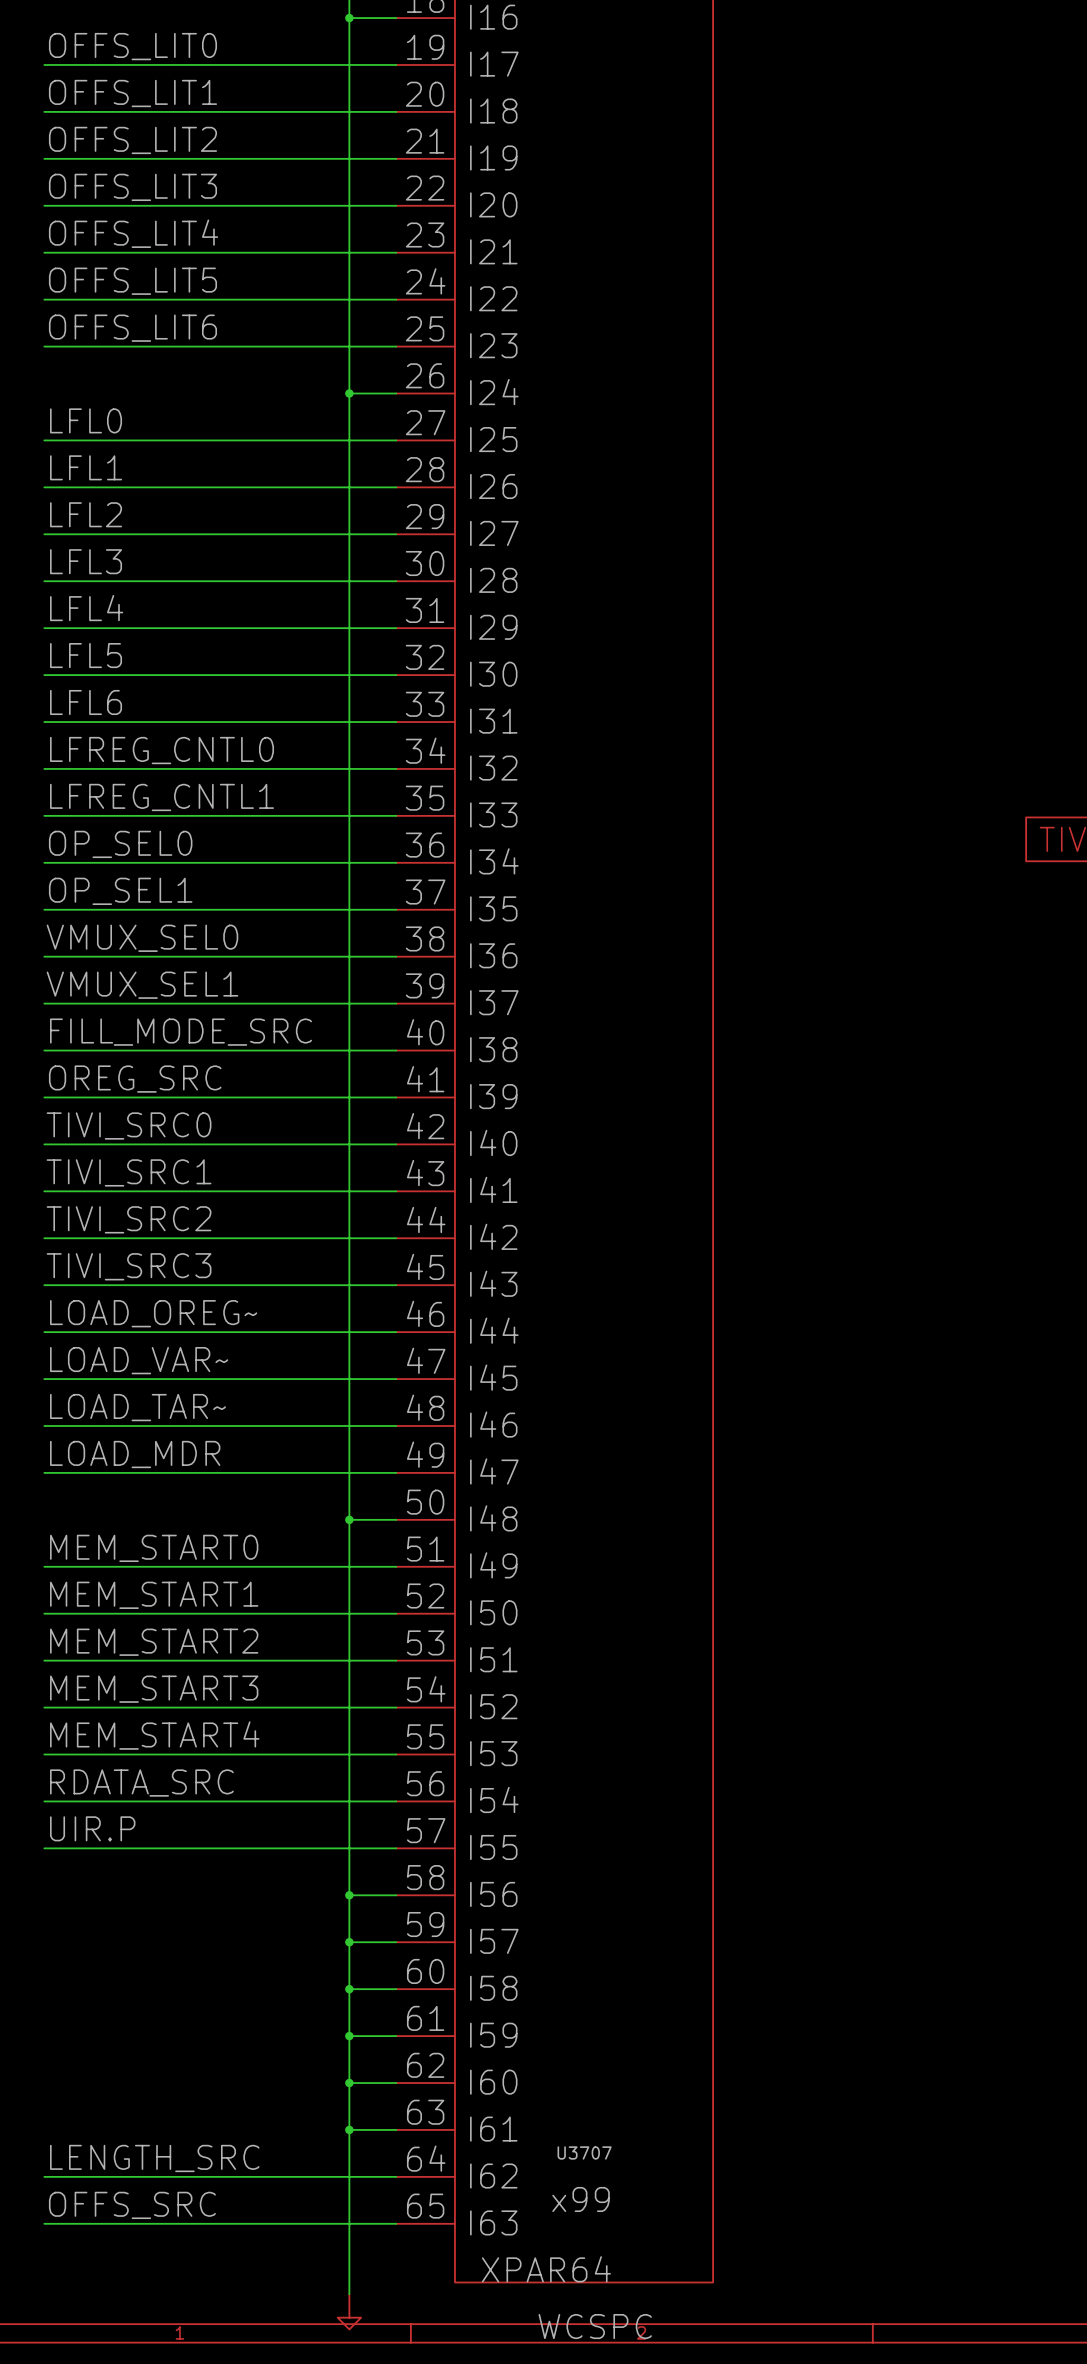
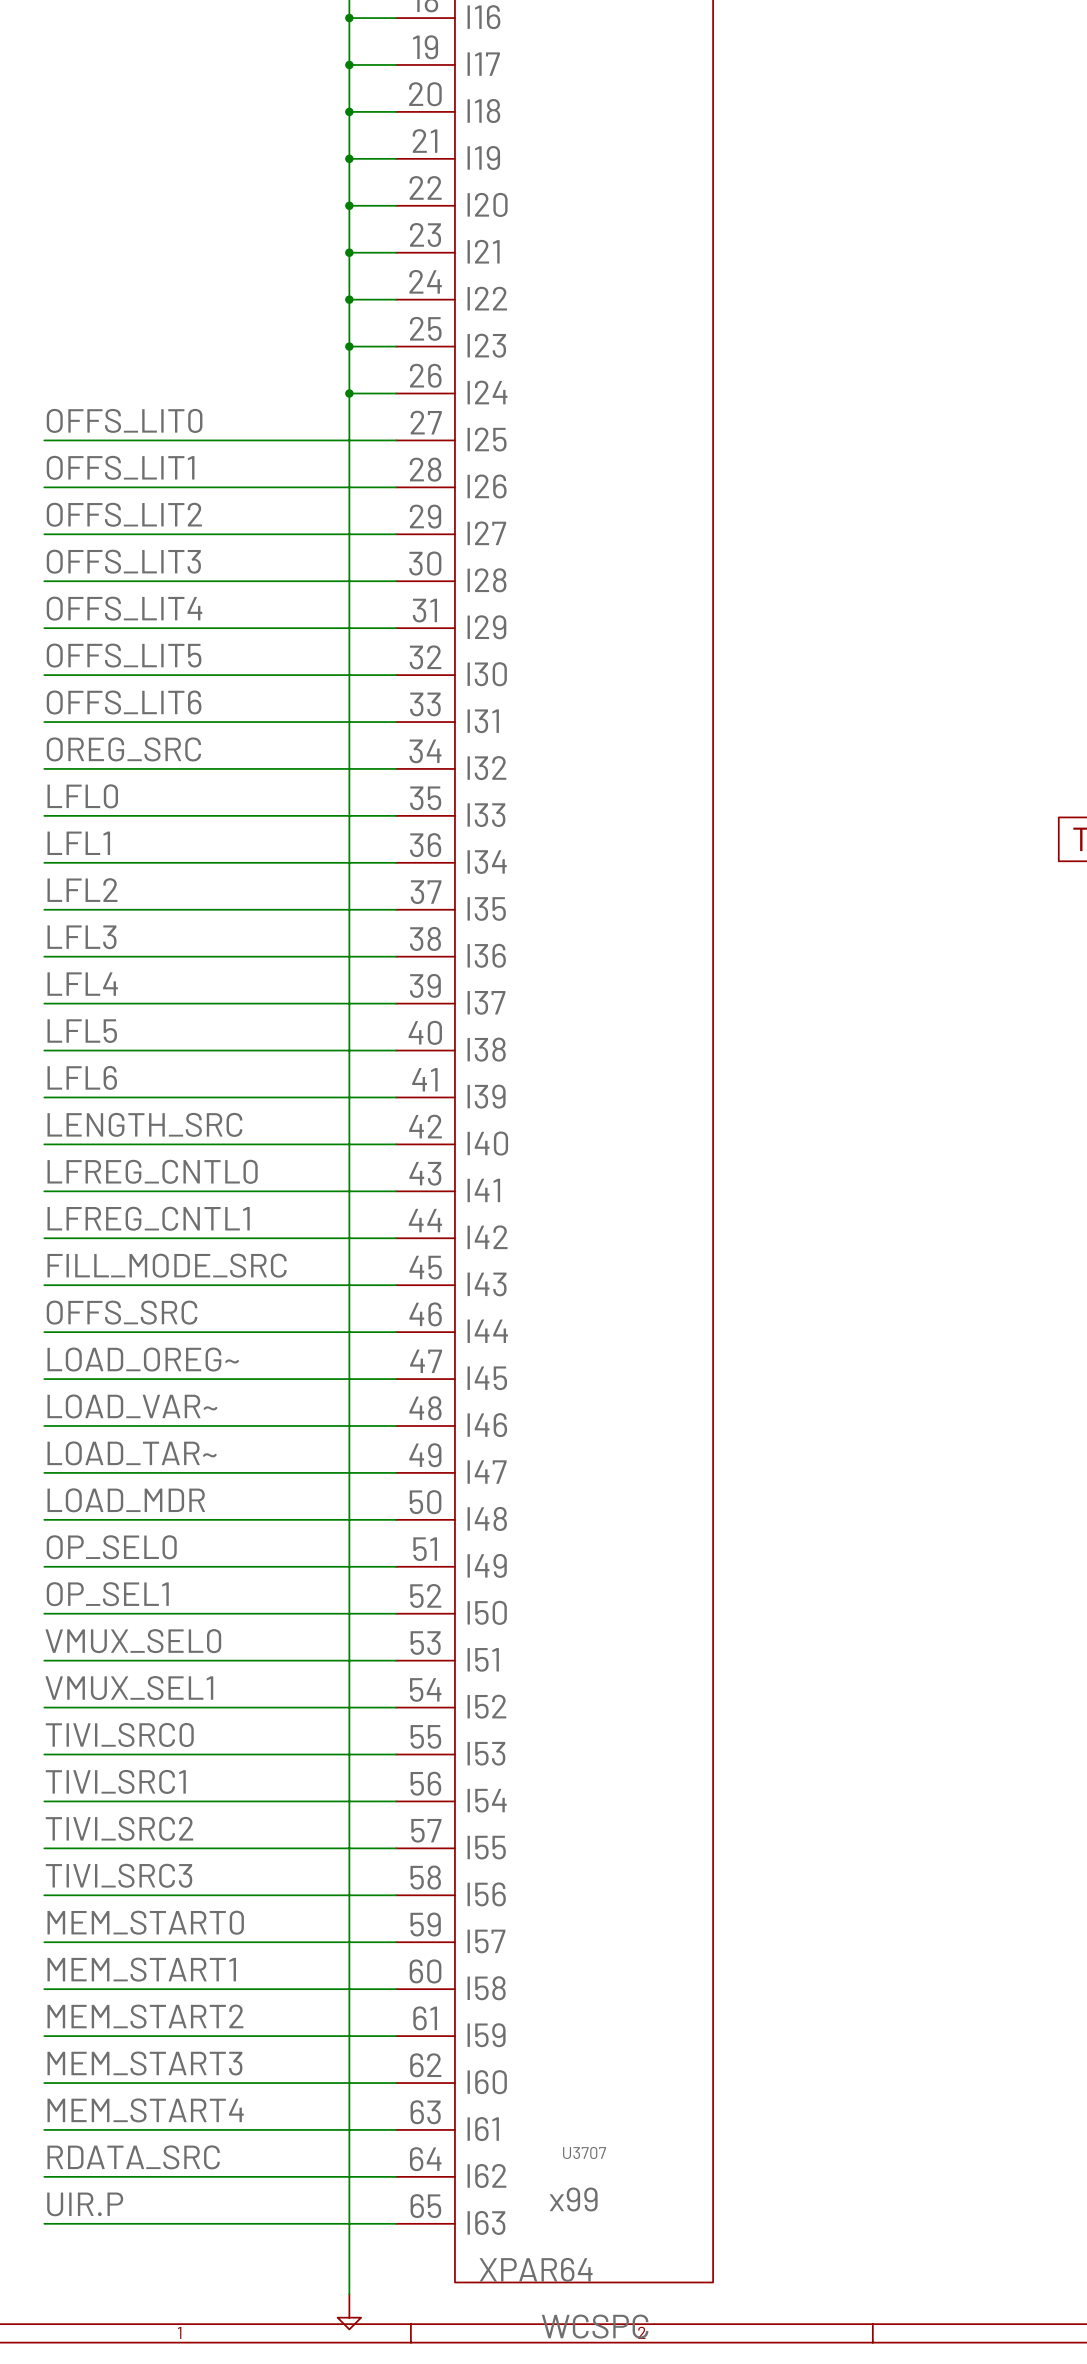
label: OFFS_LIT0 (132, 46) -> none
wire: (44, 64) (349, 64) -> none
junction: none -> (349, 64)
label: OFFS_LIT1 (132, 93) -> none
wire: (44, 111) (349, 111) -> none
junction: none -> (349, 111)
label: OFFS_LIT2 (132, 140) -> none
wire: (44, 158) (349, 158) -> none
junction: none -> (349, 158)
label: OFFS_LIT3 (132, 187) -> none
wire: (44, 205) (349, 205) -> none
junction: none -> (349, 205)
label: OFFS_LIT4 (133, 233) -> none
wire: (44, 252) (349, 252) -> none
junction: none -> (349, 252)
label: OFFS_LIT5 (132, 281) -> none
wire: (44, 299) (349, 299) -> none
junction: none -> (349, 299)
label: OFFS_LIT6 (132, 328) -> none
wire: (44, 346) (349, 346) -> none
junction: none -> (349, 346)
label: LFL0 (86, 420) -> OFFS_LIT0 (124, 420)
label: LFL1 (86, 467) -> OFFS_LIT1 (120, 467)
label: LFL2 (86, 514) -> OFFS_LIT2 (124, 514)
label: LFL3 (86, 561) -> OFFS_LIT3 (123, 561)
label: LFL4 (86, 608) -> OFFS_LIT4 (124, 608)
label: LFL5 (86, 655) -> OFFS_LIT5 (124, 655)
label: LFL6 (86, 702) -> OFFS_LIT6 (124, 702)
label: LFREG_CNTL0 (162, 750) -> OREG_SRC (123, 749)
label: LFREG_CNTL1 (162, 797) -> LFL0 (82, 796)
label: OP_SEL0 (120, 844) -> LFL1 (78, 843)
label: OP_SEL1 (120, 891) -> LFL2 (82, 890)
label: VMUX_SEL0 (142, 938) -> LFL3 (82, 937)
label: VMUX_SEL1 (142, 985) -> LFL4 (82, 984)
label: FILL_MODE_SRC (181, 1032) -> LFL5 (82, 1031)
label: OREG_SRC (135, 1079) -> LFL6 (82, 1077)
label: TIVI_SRC0 (129, 1125) -> LENGTH_SRC (144, 1124)
label: TIVI_SRC1 (129, 1172) -> LFREG_CNTL0 (152, 1171)
label: TIVI_SRC2 (129, 1219) -> LFREG_CNTL1 (148, 1218)
label: TIVI_SRC3 (129, 1266) -> FILL_MODE_SRC (167, 1265)
label: LOAD_OREG~ (153, 1313) -> OFFS_SRC (122, 1312)
label: LOAD_VAR~ (139, 1360) -> LOAD_OREG~ (143, 1359)
label: LOAD_TAR~ (137, 1407) -> LOAD_VAR~ (132, 1406)
label: LOAD_MDR (135, 1454) -> LOAD_TAR~ (132, 1453)
label: none -> LOAD_MDR (126, 1500)
wire: none -> (44, 1519) (349, 1519)
junction: (349, 1519) -> none
label: MEM_START0 (154, 1548) -> OP_SEL0 (111, 1547)
label: MEM_START1 (154, 1595) -> OP_SEL1 (107, 1594)
label: MEM_START2 (154, 1642) -> VMUX_SEL0 (133, 1641)
label: MEM_START3 (154, 1689) -> VMUX_SEL1 (129, 1688)
label: MEM_START4 (154, 1735) -> TIVI_SRC0 (119, 1734)
label: RDATA_SRC (141, 1783) -> TIVI_SRC1 (115, 1781)
label: UIR.P (92, 1828) -> TIVI_SRC2 (119, 1828)
label: none -> TIVI_SRC3 (119, 1875)
wire: none -> (44, 1895) (349, 1895)
junction: (349, 1895) -> none
label: none -> MEM_START0 (145, 1922)
wire: none -> (44, 1942) (349, 1942)
junction: (349, 1942) -> none
label: none -> MEM_START1 (141, 1969)
wire: none -> (44, 1989) (349, 1989)
junction: (349, 1989) -> none
label: none -> MEM_START2 (145, 2016)
wire: none -> (44, 2036) (349, 2036)
junction: (349, 2036) -> none
label: none -> MEM_START3 (144, 2063)
wire: none -> (44, 2083) (349, 2083)
junction: (349, 2083) -> none
label: none -> MEM_START4 (145, 2110)
wire: none -> (44, 2129) (349, 2129)
junction: (349, 2129) -> none
label: LENGTH_SRC (154, 2158) -> RDATA_SRC (133, 2157)
label: OFFS_SRC (132, 2205) -> UIR.P (85, 2204)

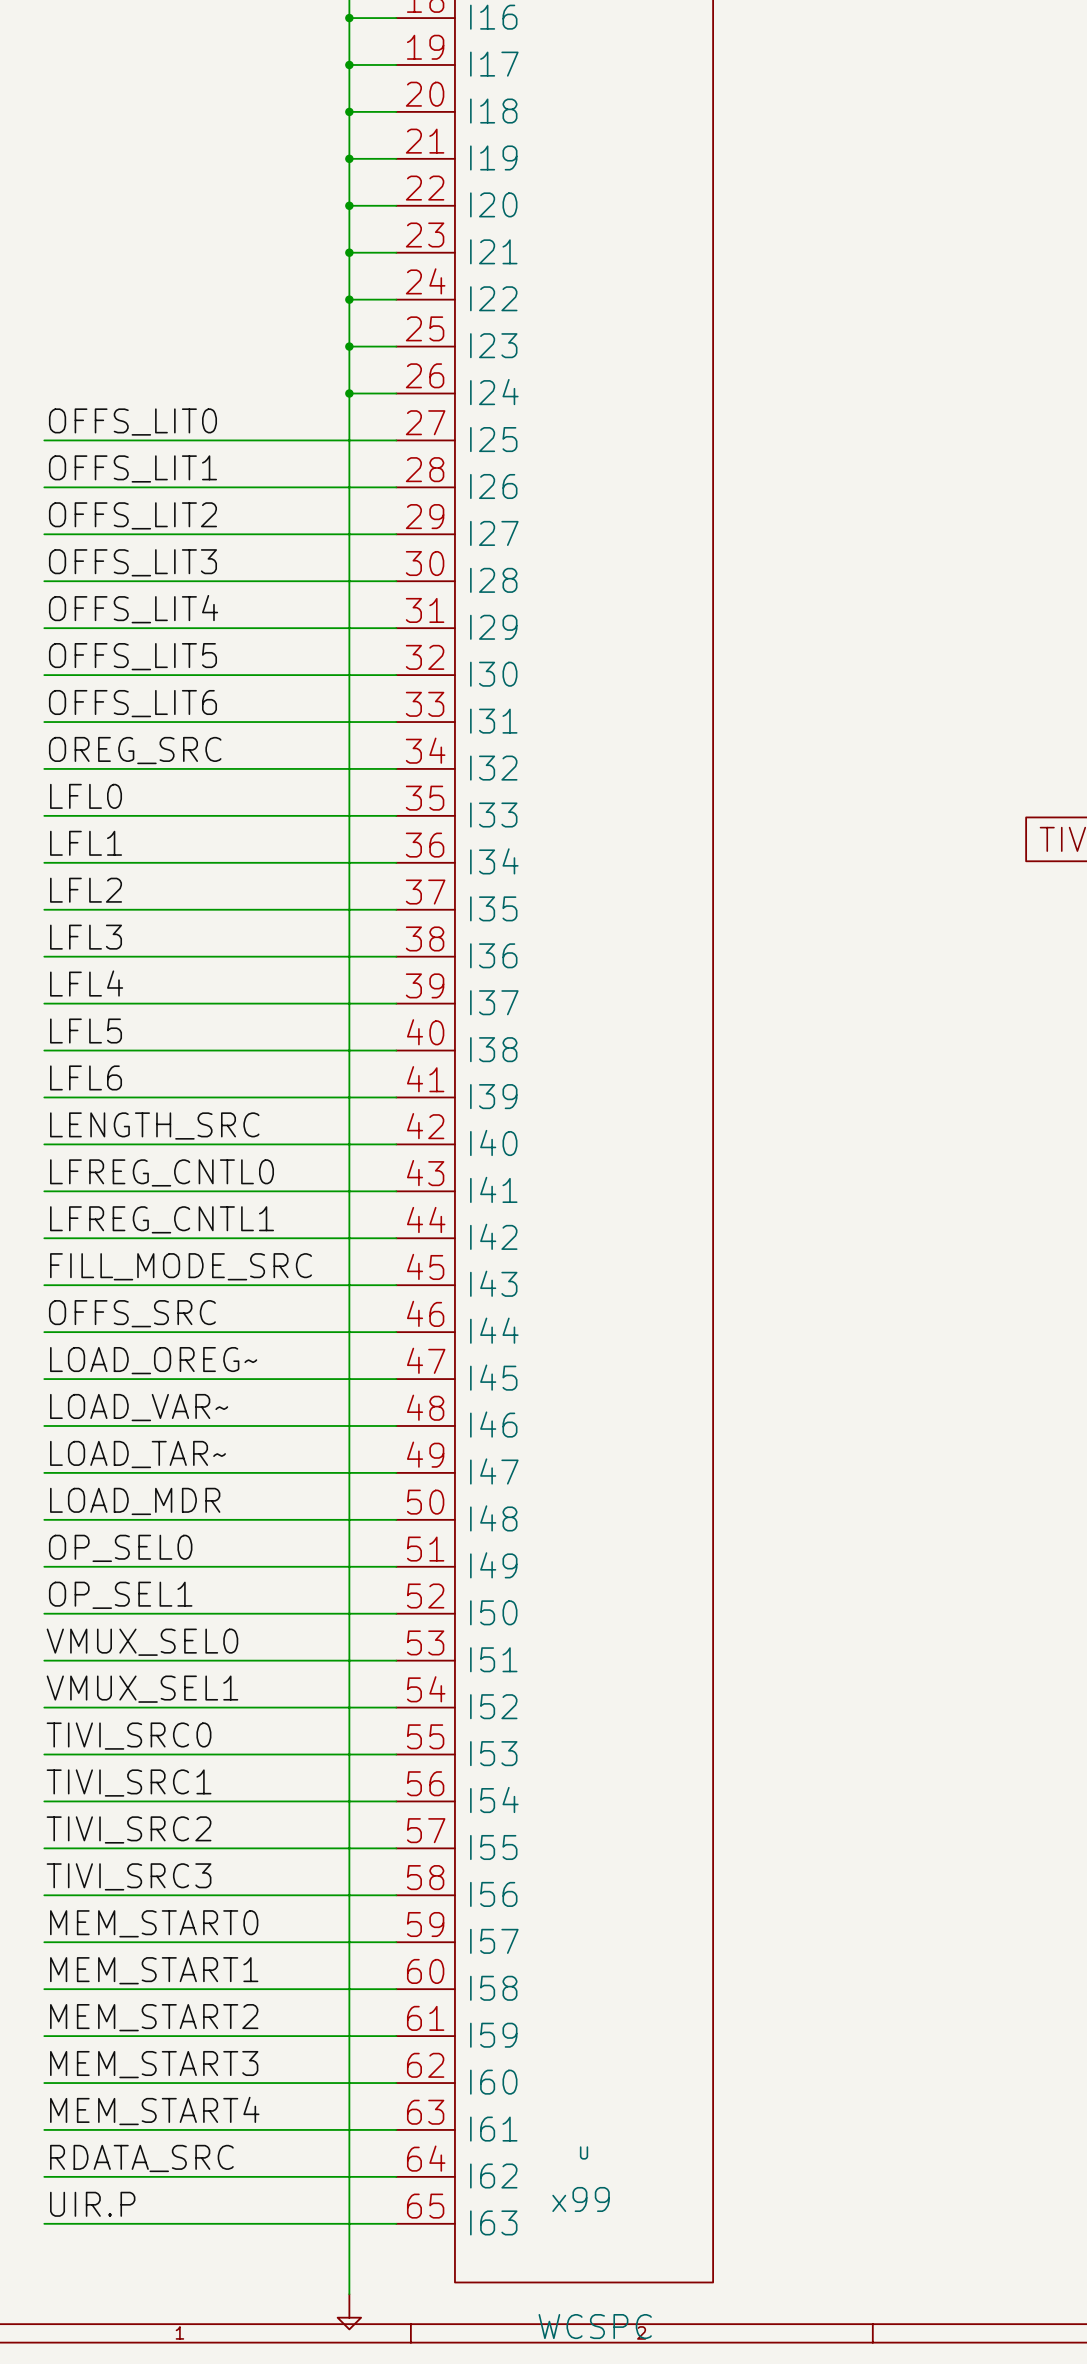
U3707 name: U3707 (584, 2152) -> U (584, 2152)
U3707 value: XPAR64 (536, 2269) -> none

